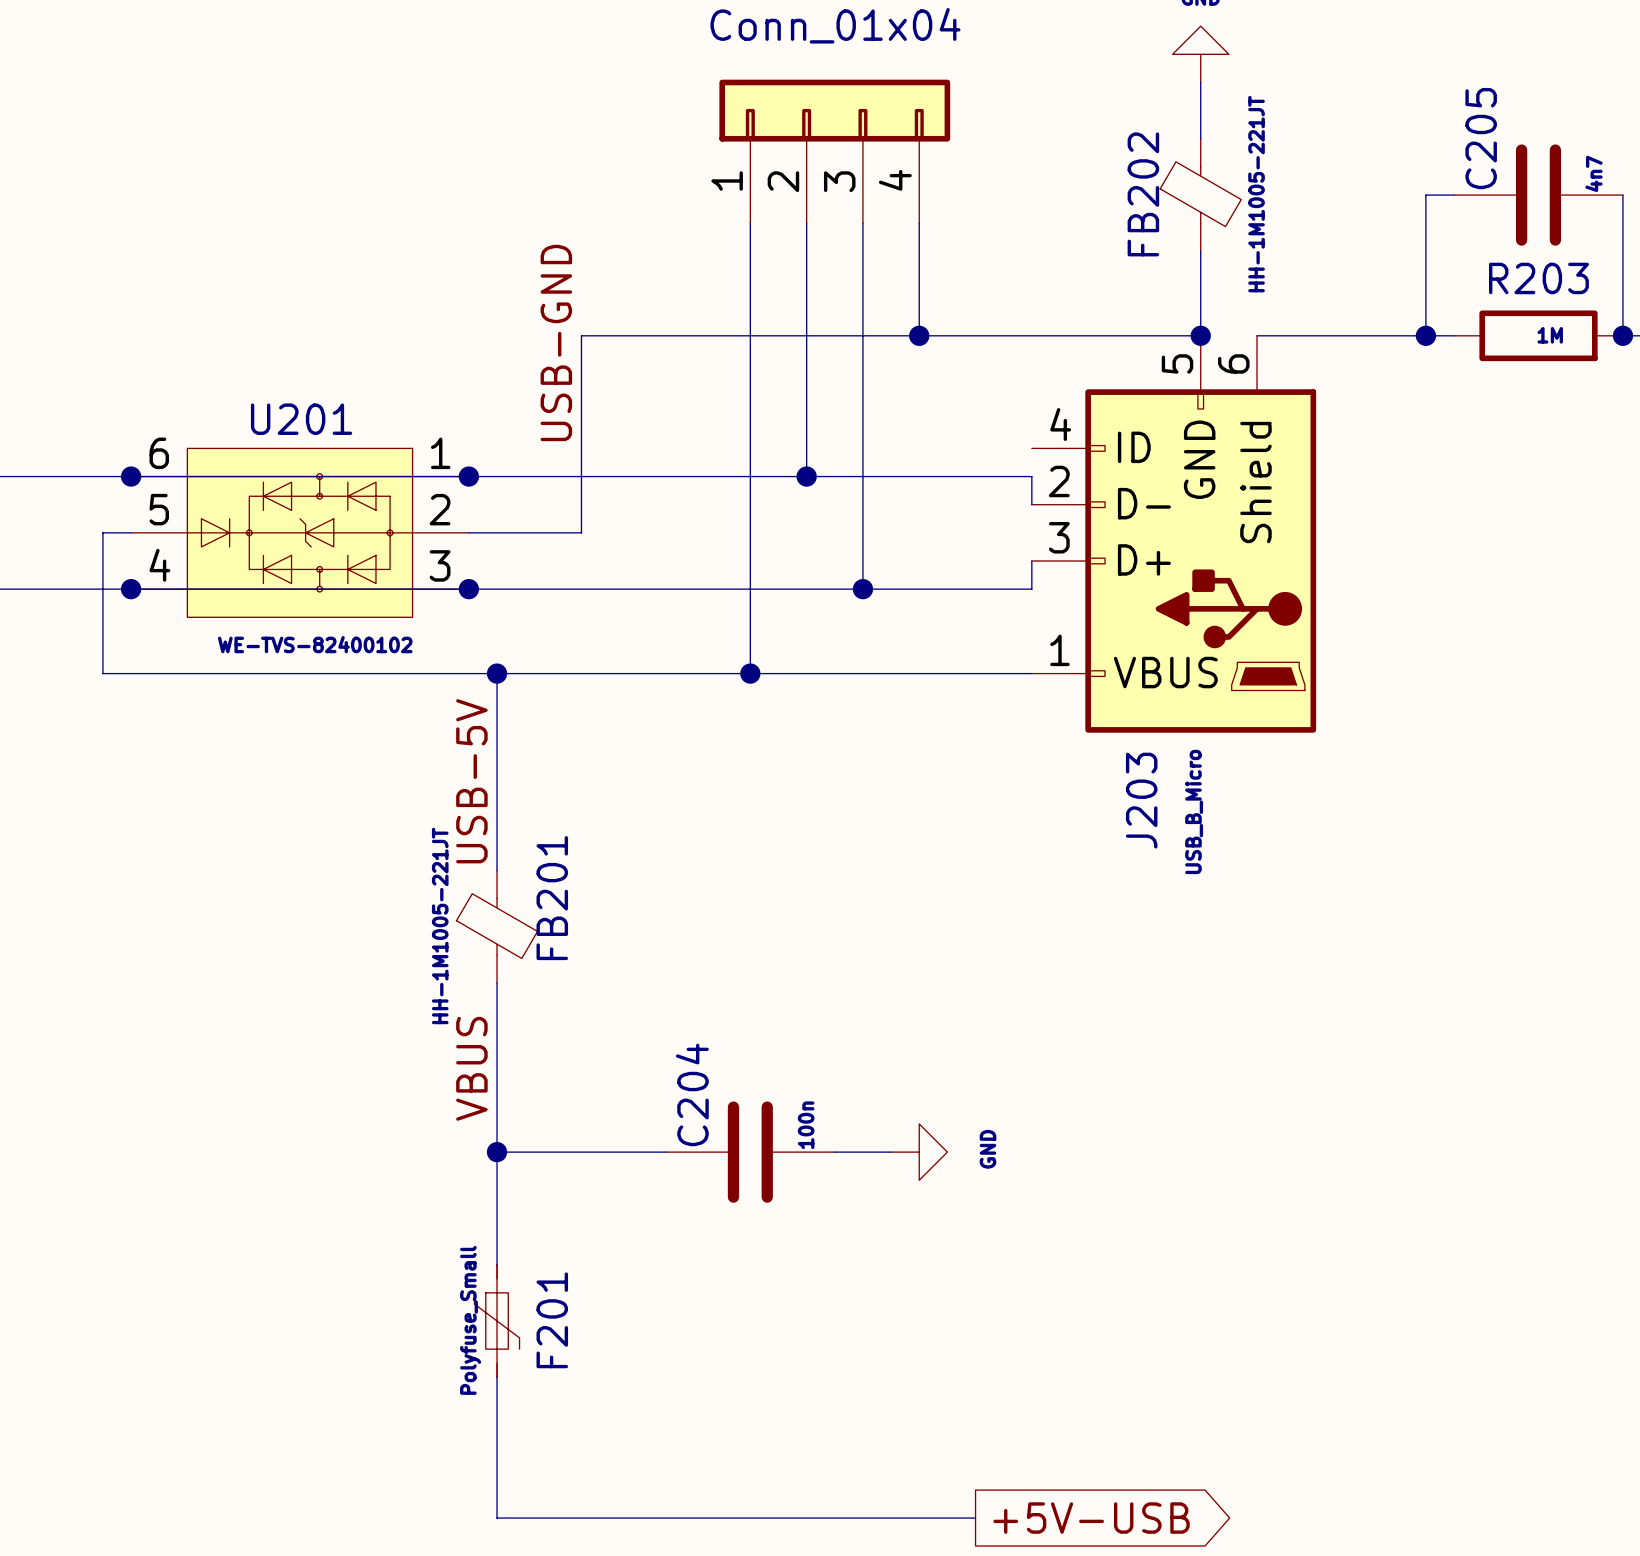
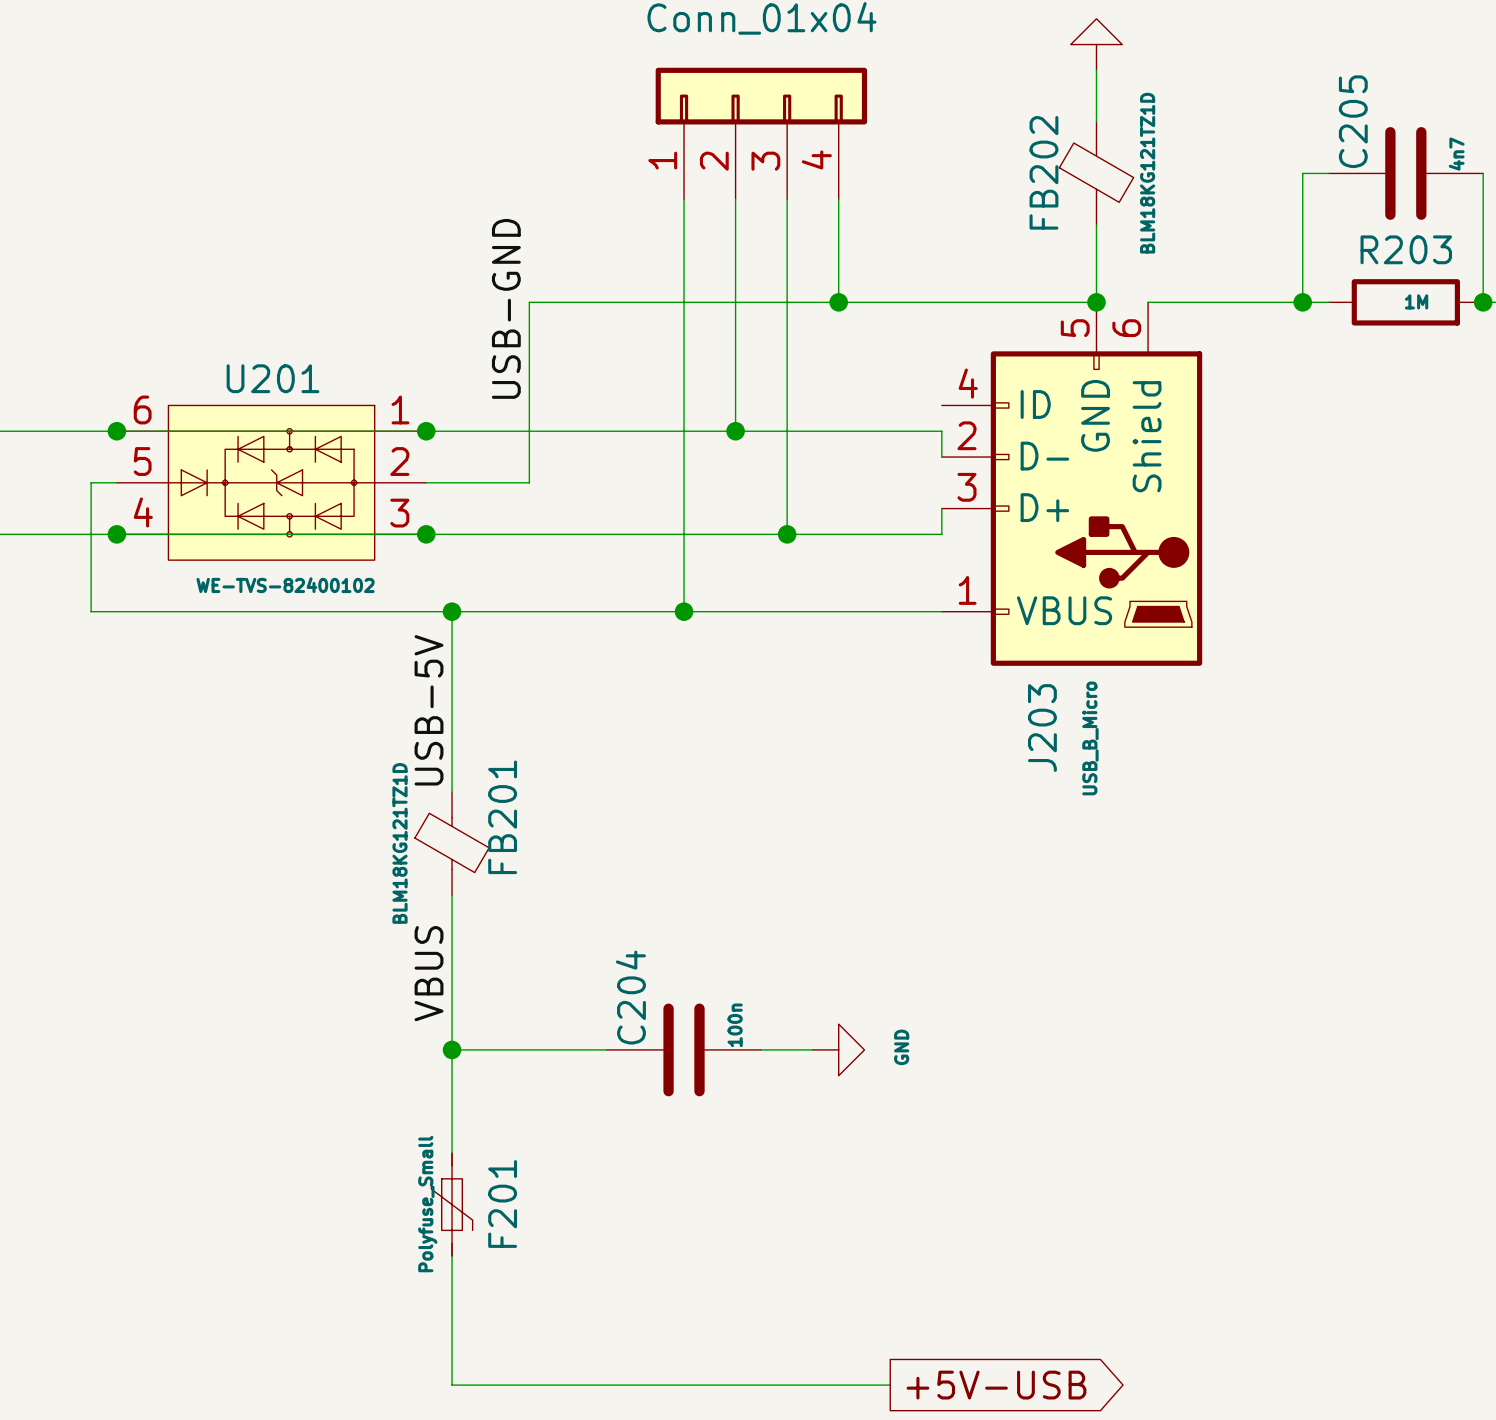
FB202 value: HH-1M1005-221JT (1256, 194) -> BLM18KG121TZ1D (1147, 173)
FB201 value: HH-1M1005-221JT (440, 925) -> BLM18KG121TZ1D (400, 843)

